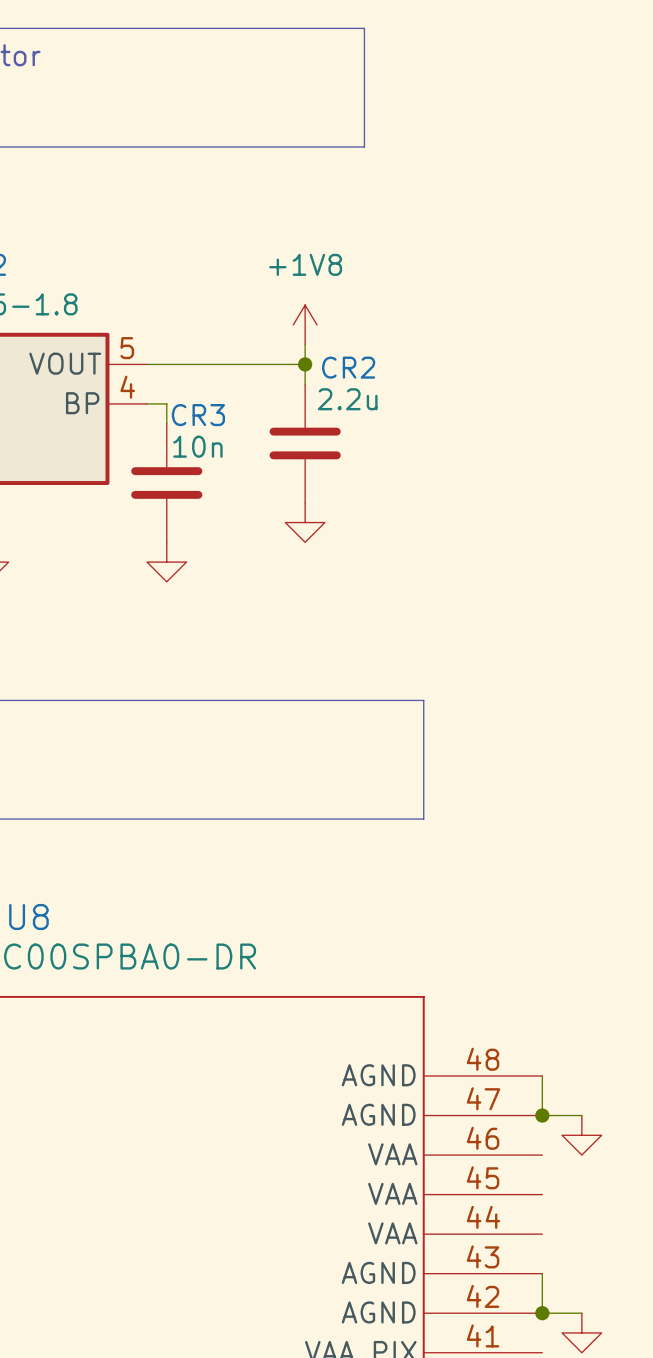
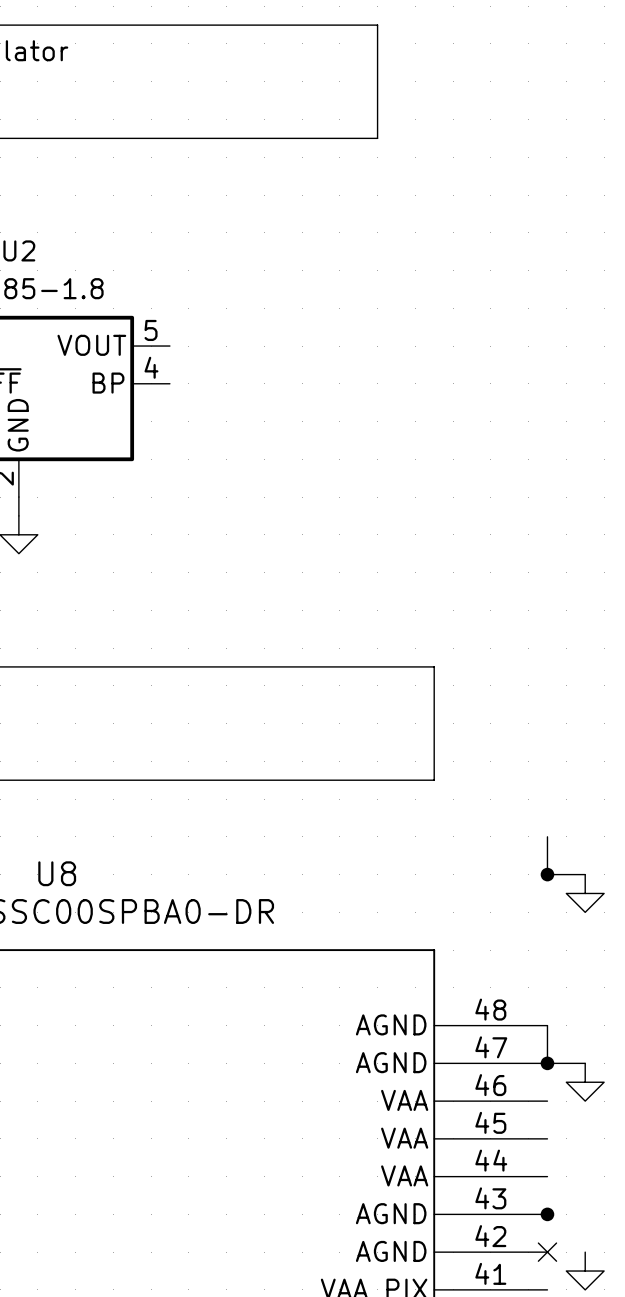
power symbol: +1V8 (305, 324) -> none
wire: (305, 344) (305, 384) -> none
wire: (147, 364) (305, 364) -> none
junction: (305, 364) -> none
wire: (147, 403) (166, 403) (166, 423) -> none
CR2: 2.2u (305, 443) -> none
CR3: 10n (166, 483) -> none
power symbol: (305, 522) -> none
power symbol: (166, 562) -> none
wire: none -> (547, 836) (547, 874) (585, 874)
junction: none -> (547, 874)
power symbol: none -> (585, 893)
wire: (542, 1273) (542, 1313) (581, 1313) -> none
junction position: (542, 1313) -> (547, 1214)
no-connect mark: none -> (547, 1252)

